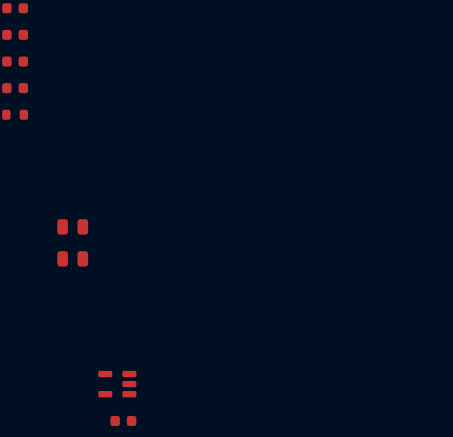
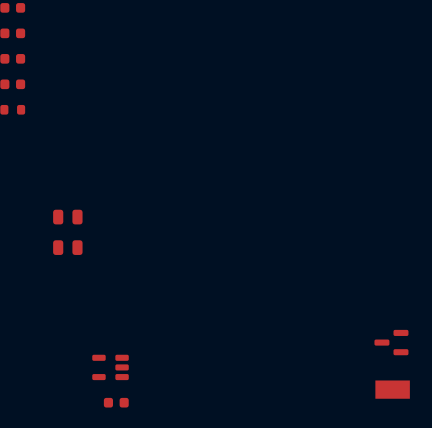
part: none -> (391, 342)
part: none -> (392, 389)

